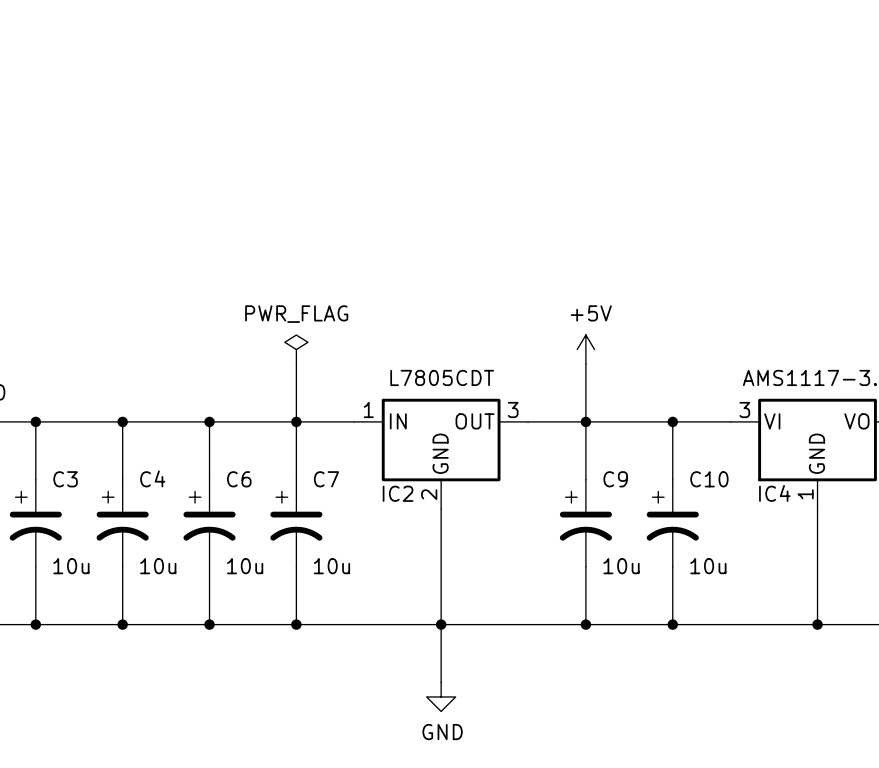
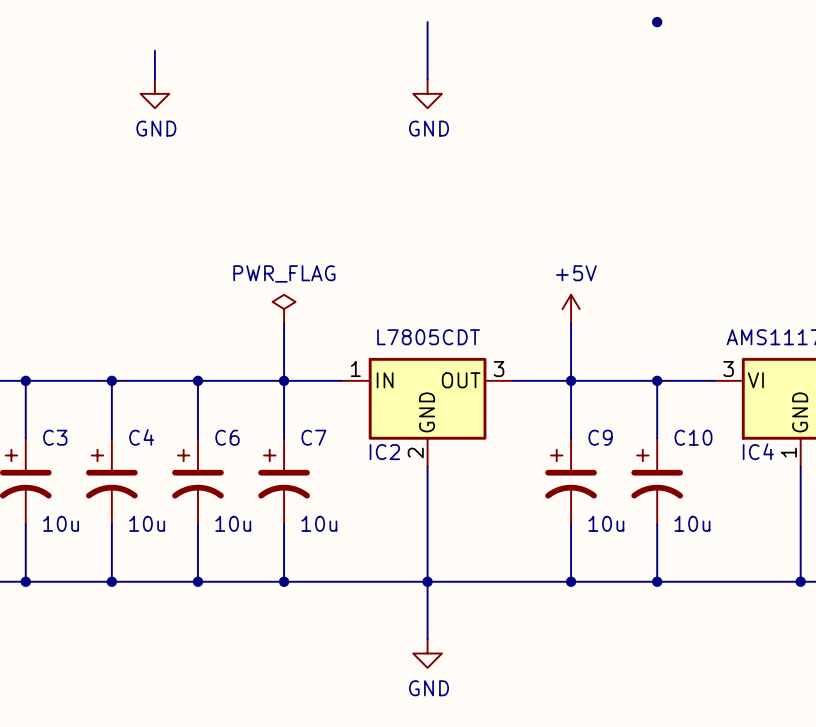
wire: none -> (427, 22) (427, 79)
junction: none -> (657, 22)
wire: none -> (154, 50) (154, 79)
power symbol: none -> GND (154, 93)
power symbol: none -> GND (427, 93)

